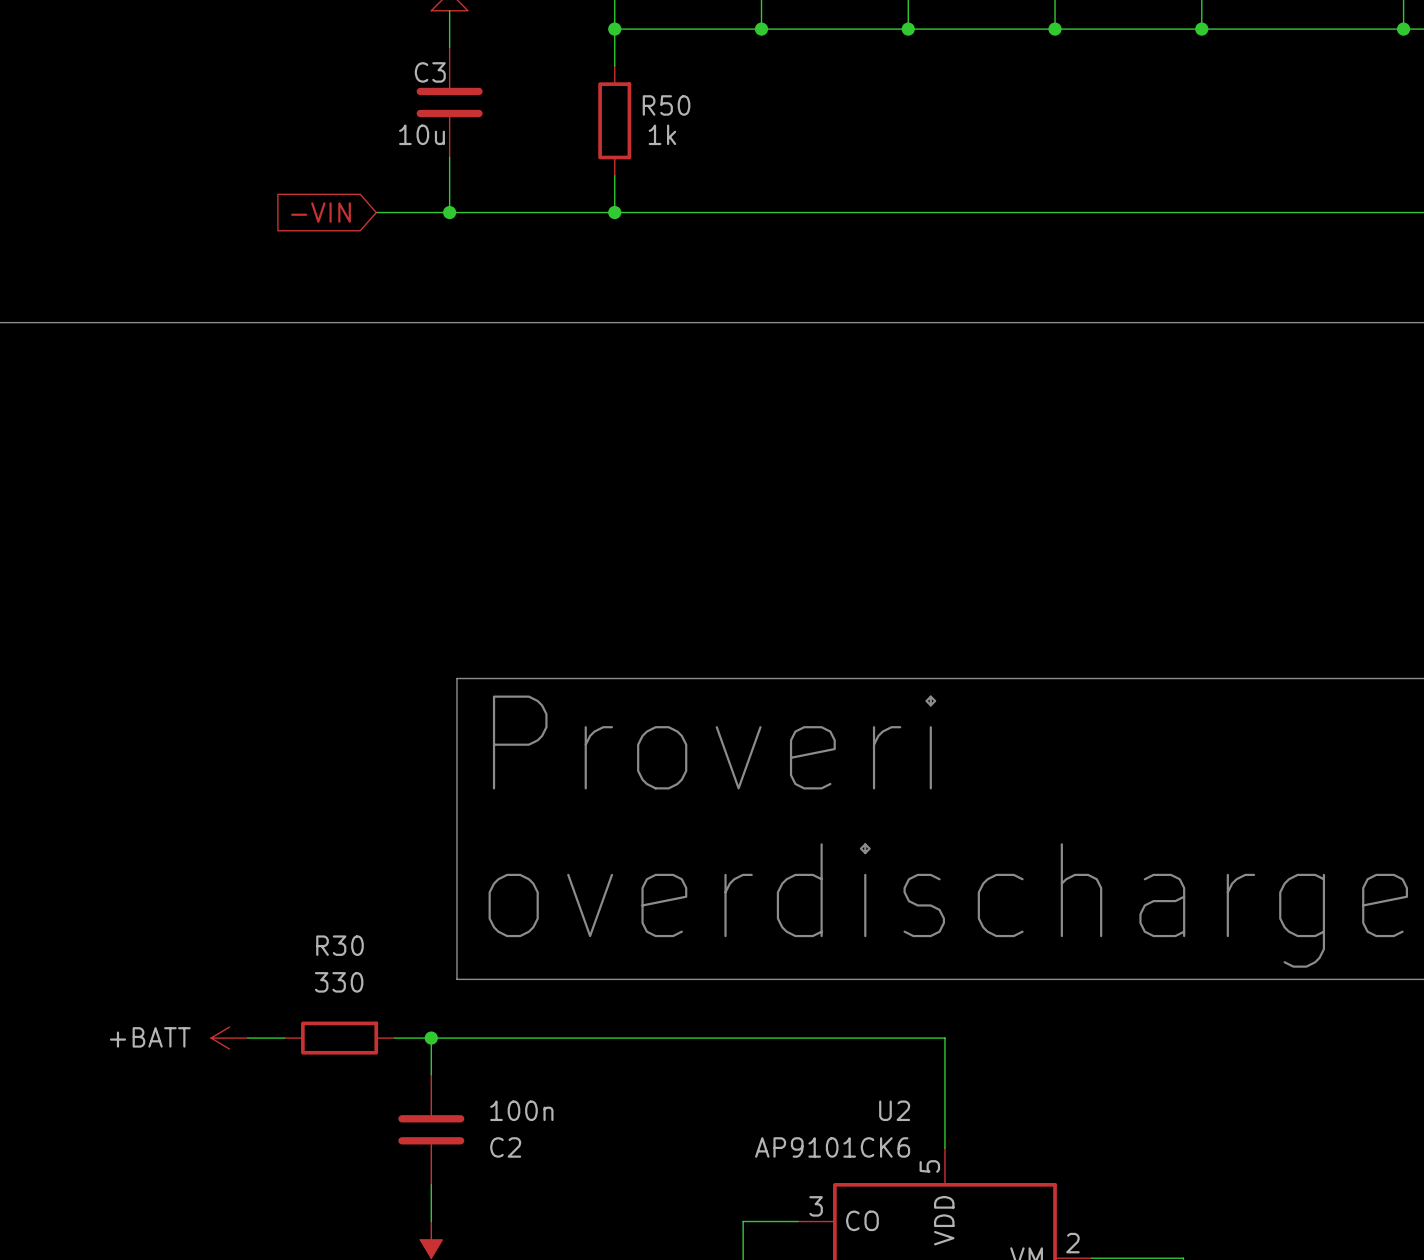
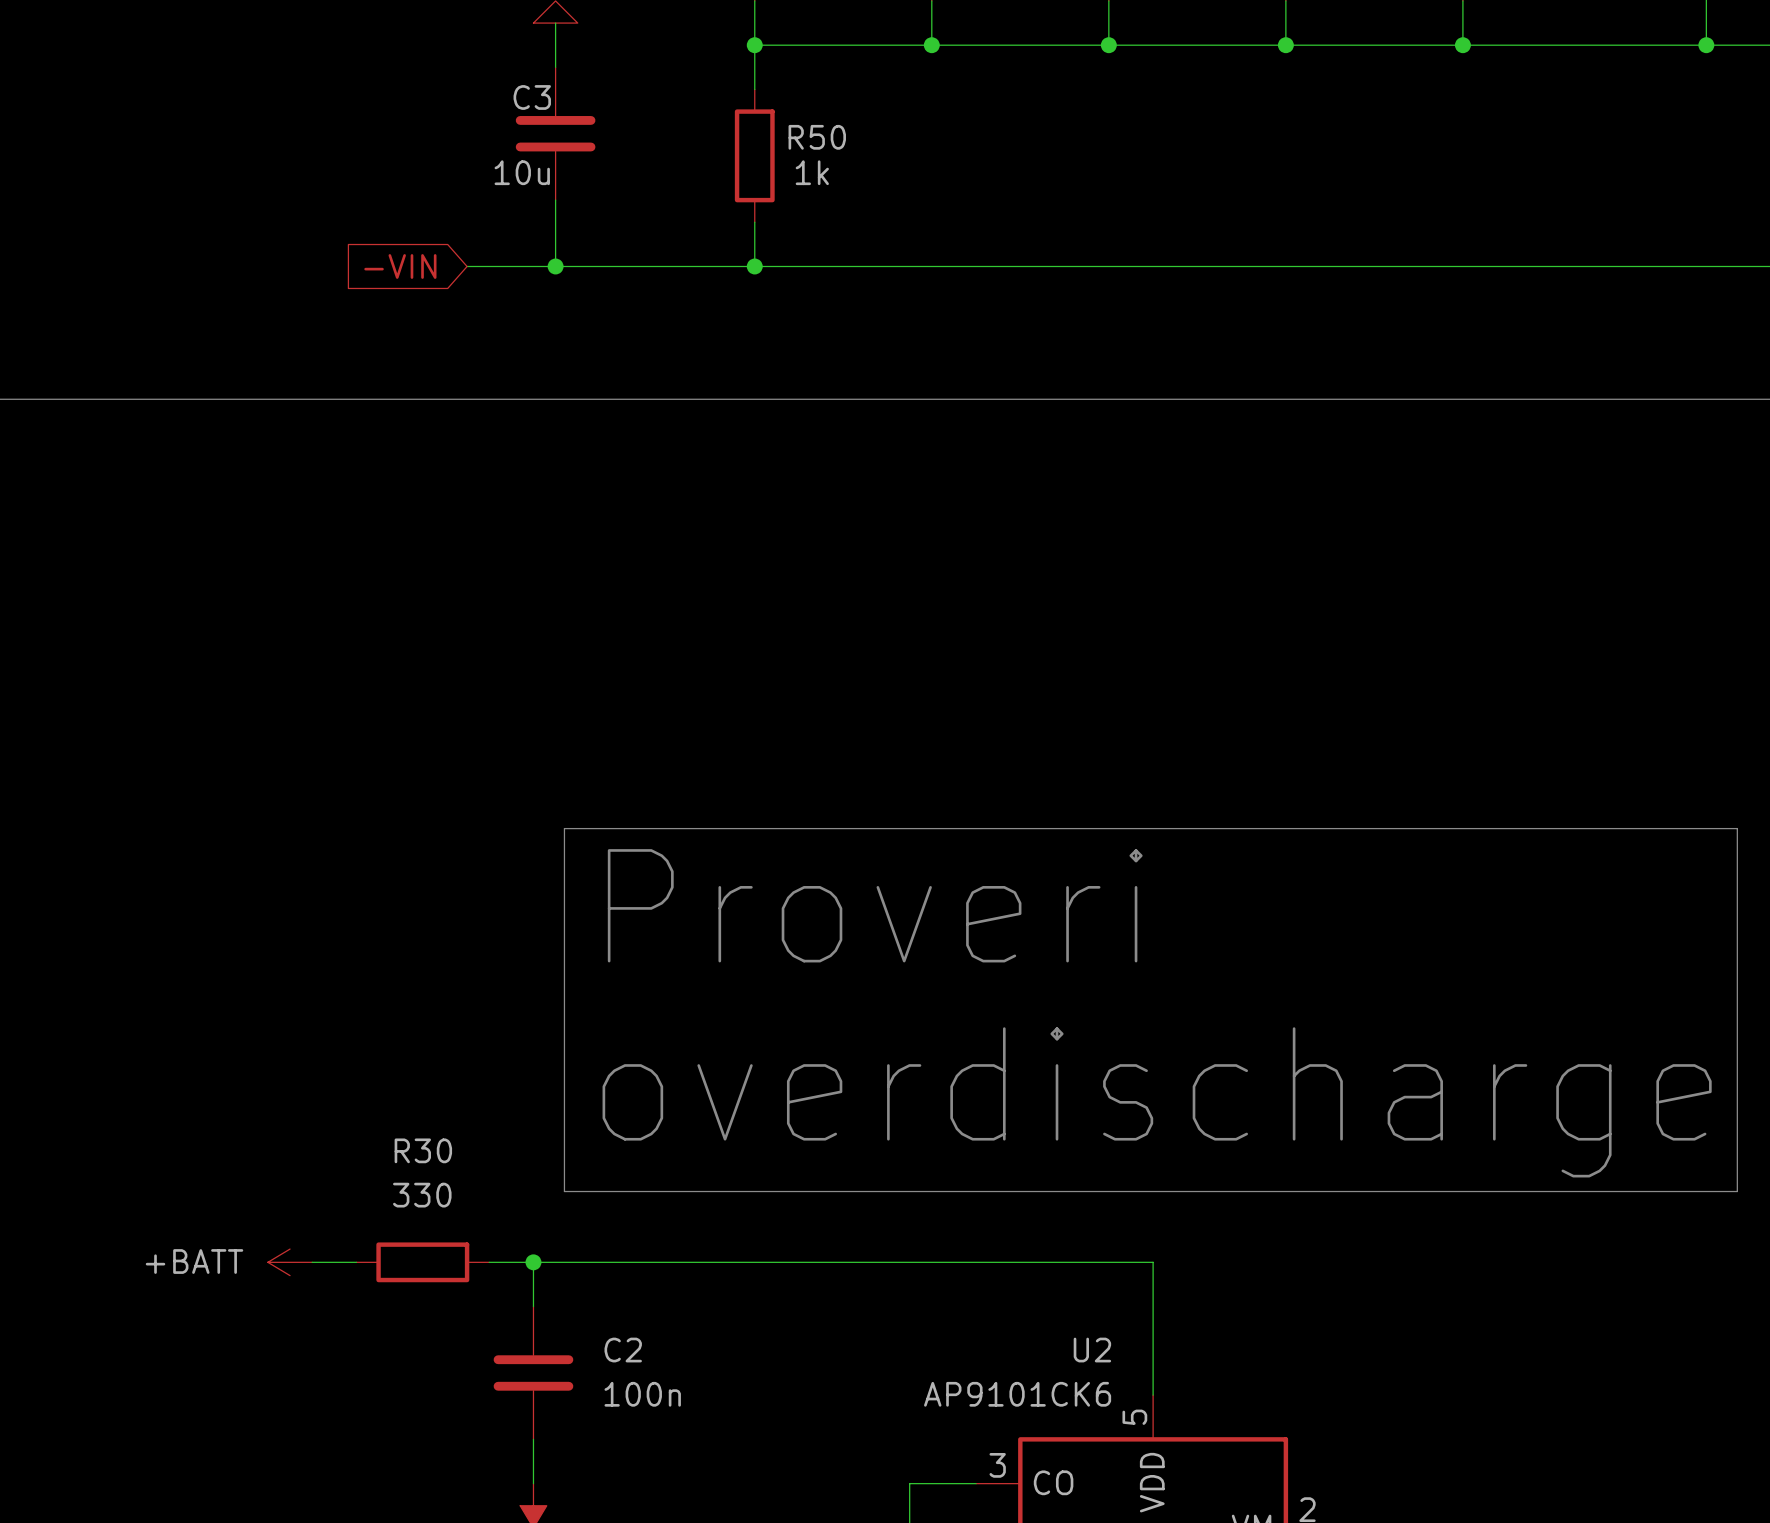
C2 value position: 100n (521, 1110) -> 100n (642, 1394)
C2 name position: C2 (505, 1147) -> C2 (623, 1350)

